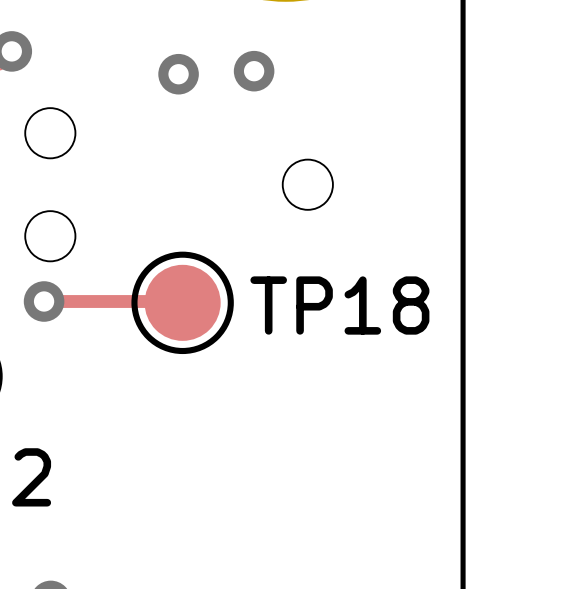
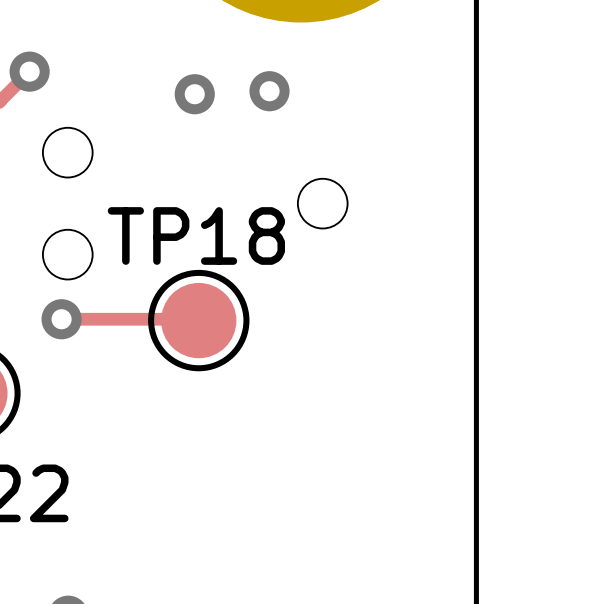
TP18 name position: TP18 (339, 305) -> TP18 (196, 235)

